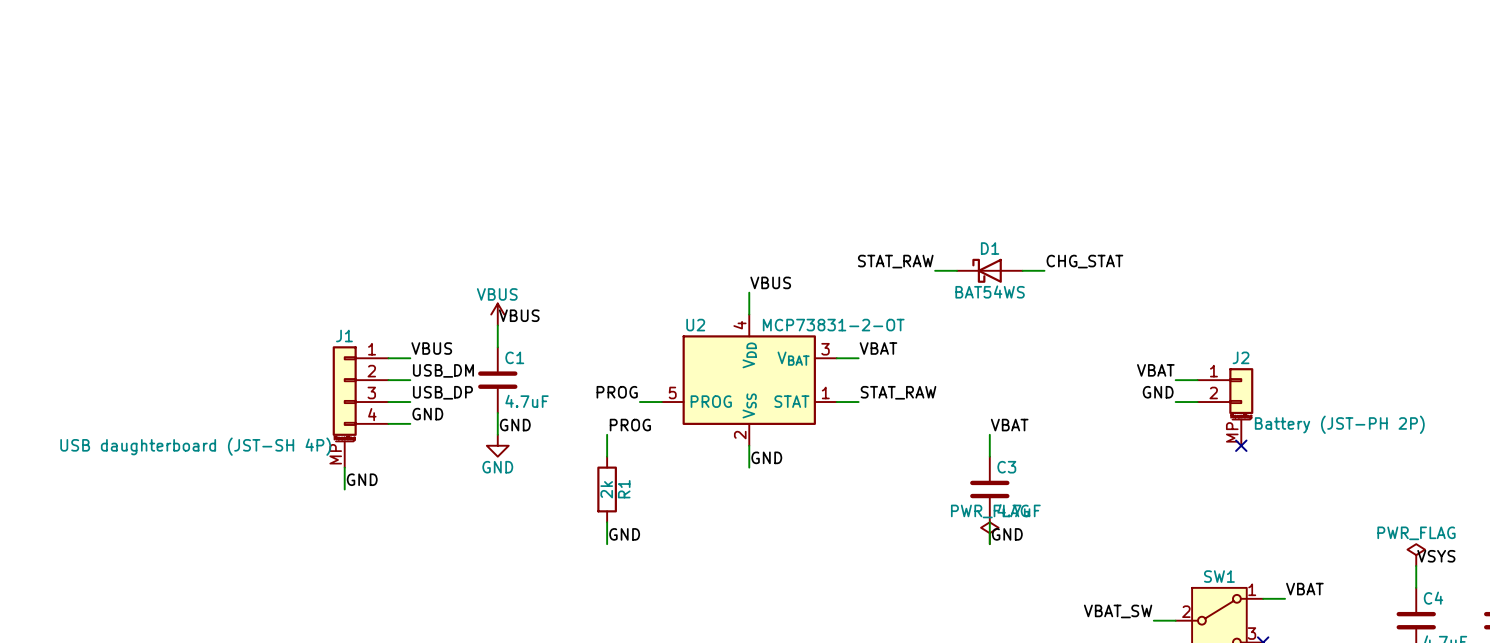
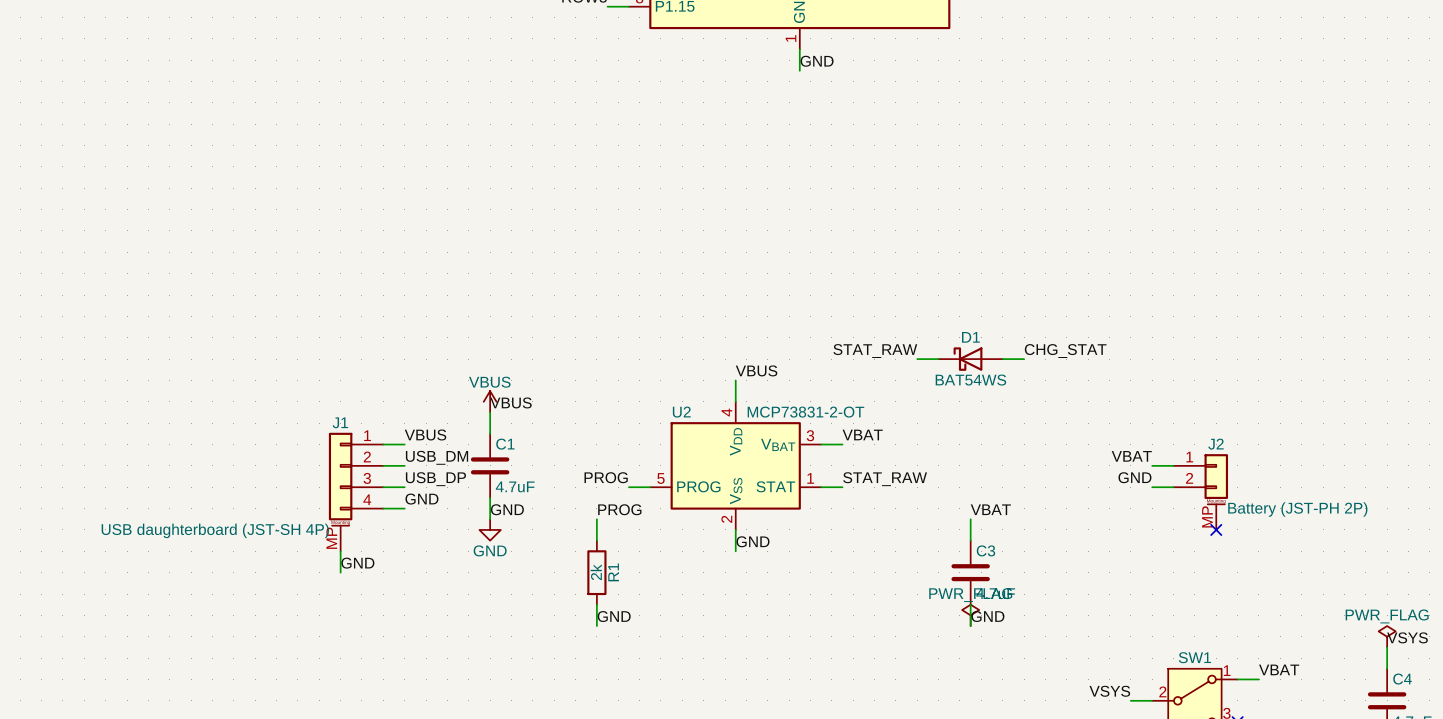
label: VBAT_SW (1118, 611) -> VSYS (1109, 691)

